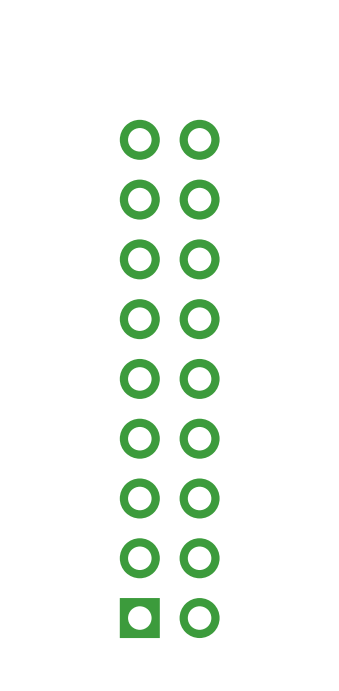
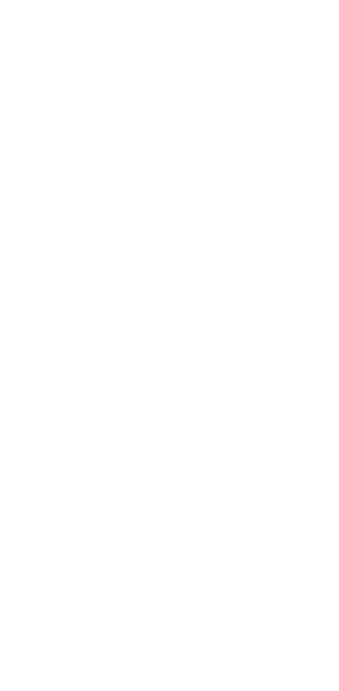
part: (169, 378) -> none

